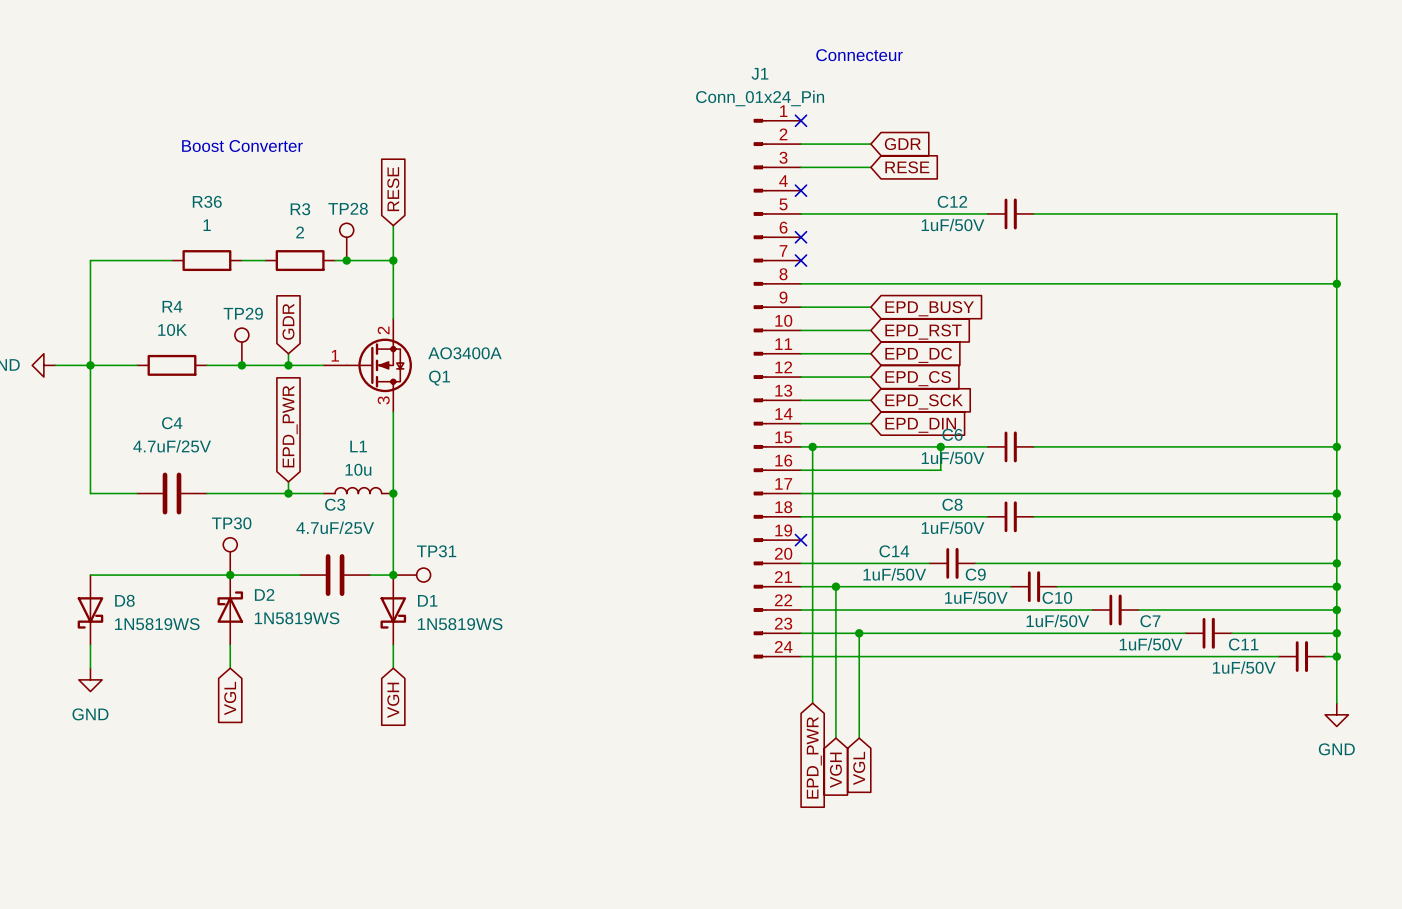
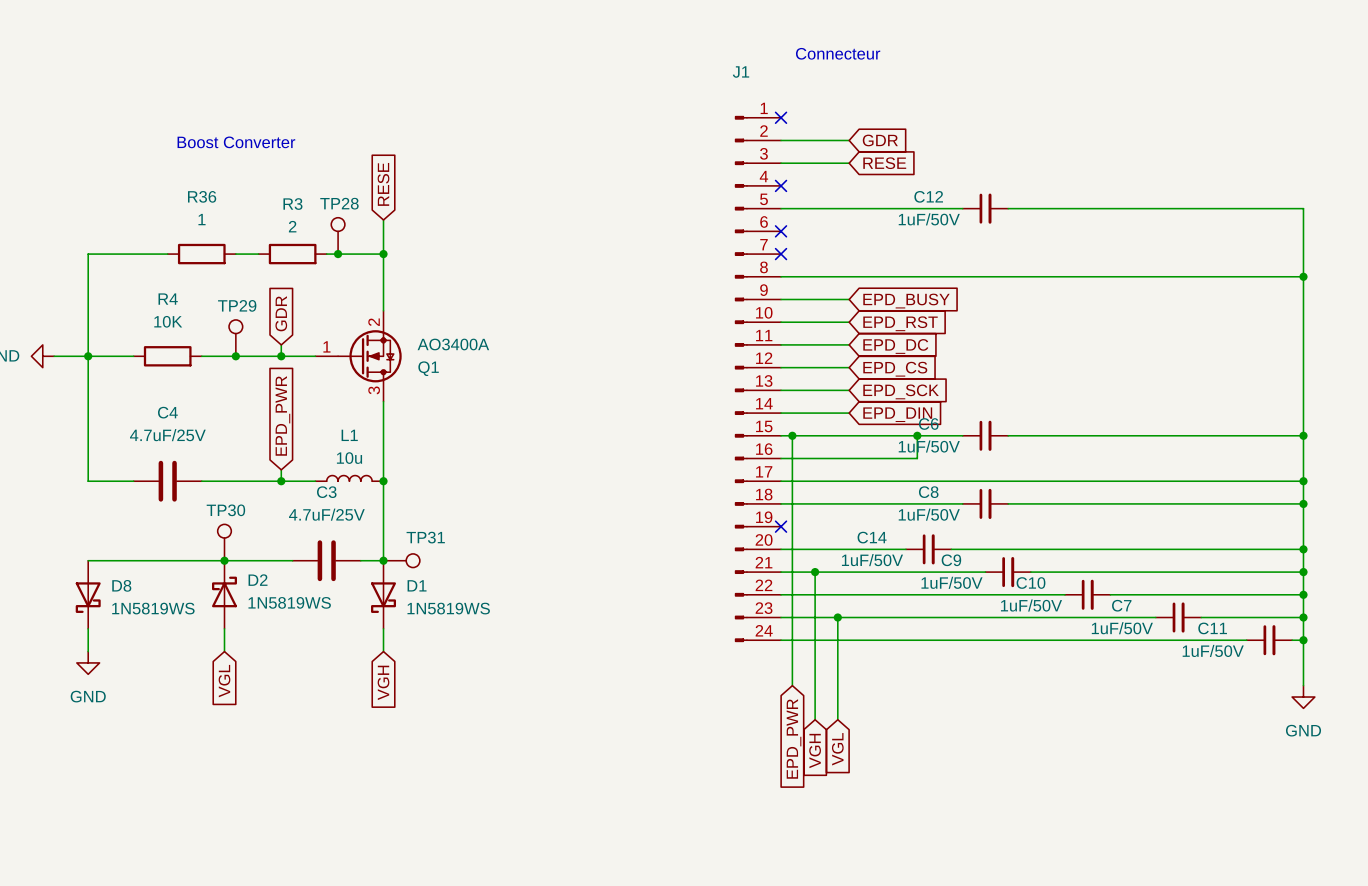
J1 value: Conn_01x24_Pin (760, 98) -> none

